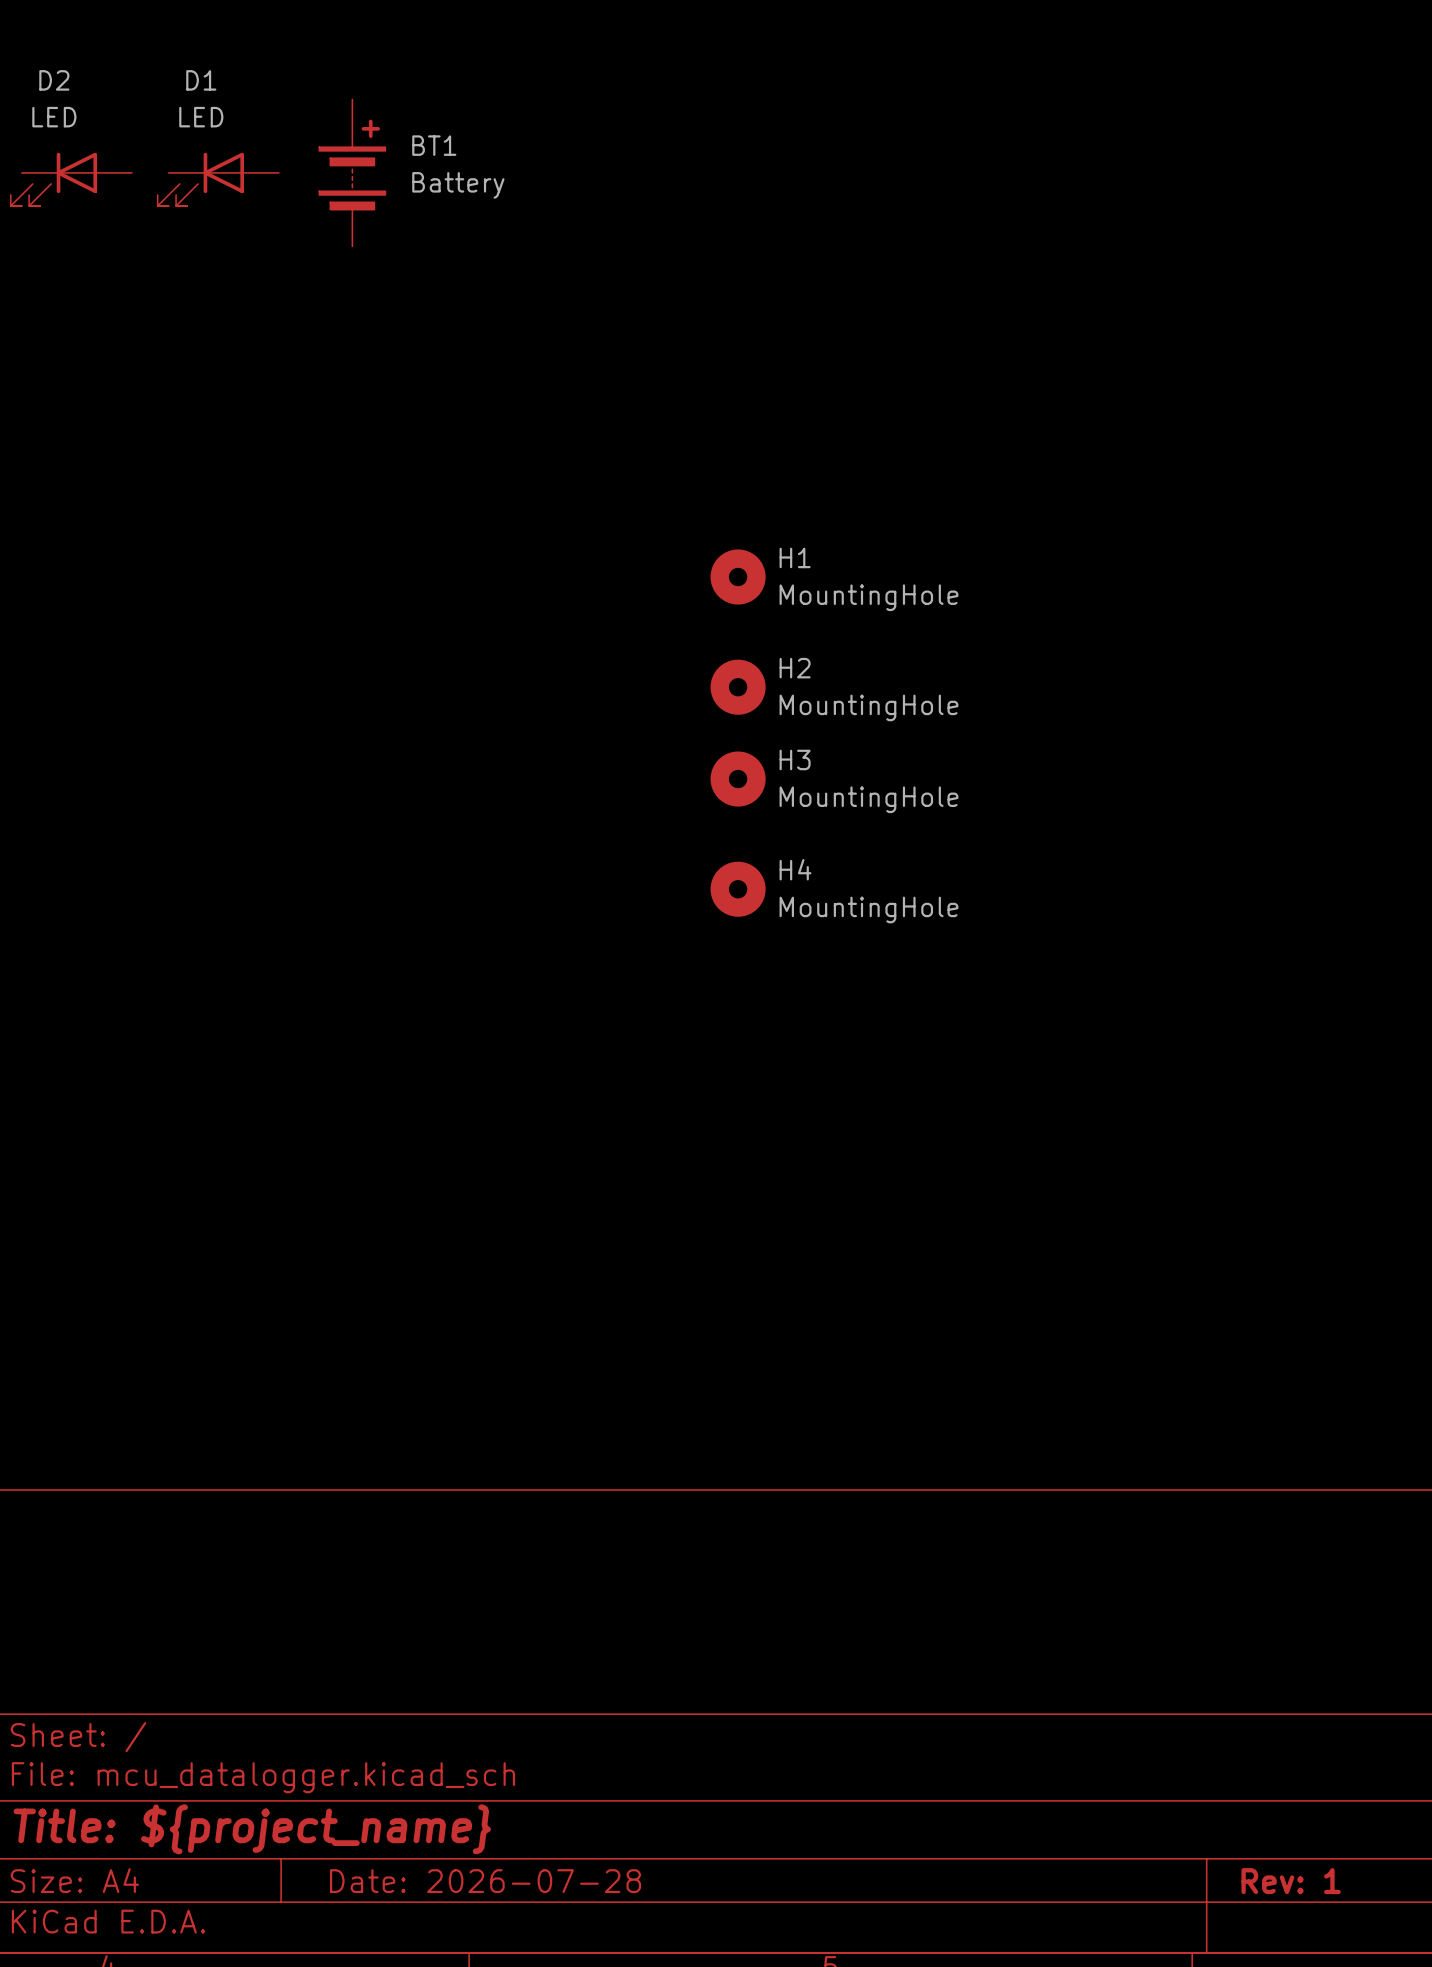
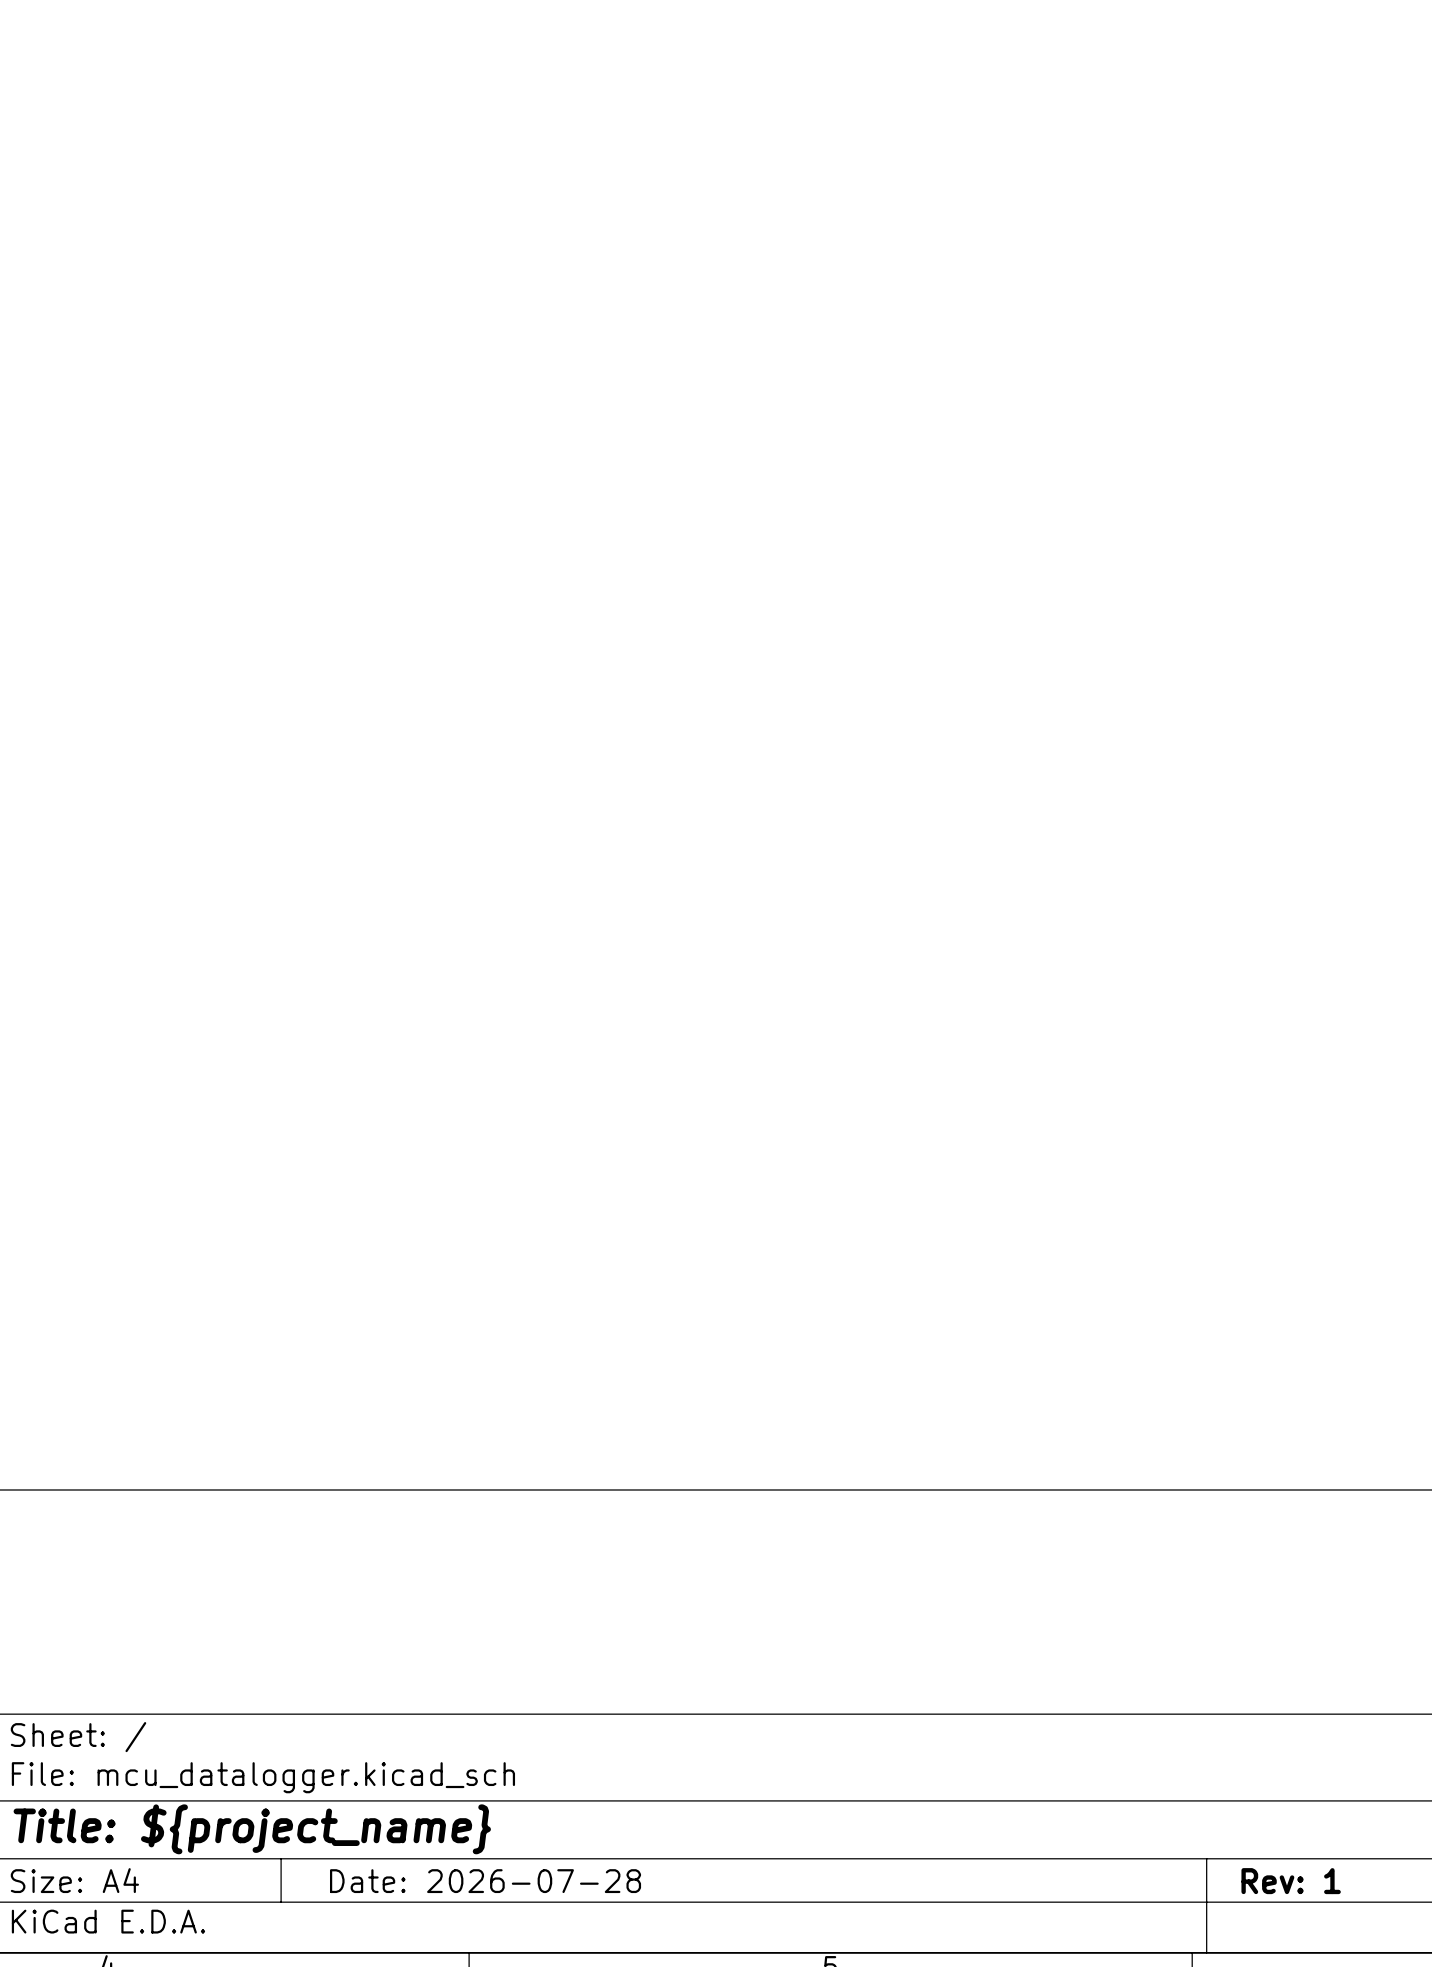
BT1: Battery (352, 172) -> none
D2: LED (71, 179) -> none
D1: LED (218, 179) -> none
H1: MountingHole (738, 577) -> none
H2: MountingHole (738, 687) -> none
H3: MountingHole (738, 779) -> none
H4: MountingHole (738, 889) -> none

